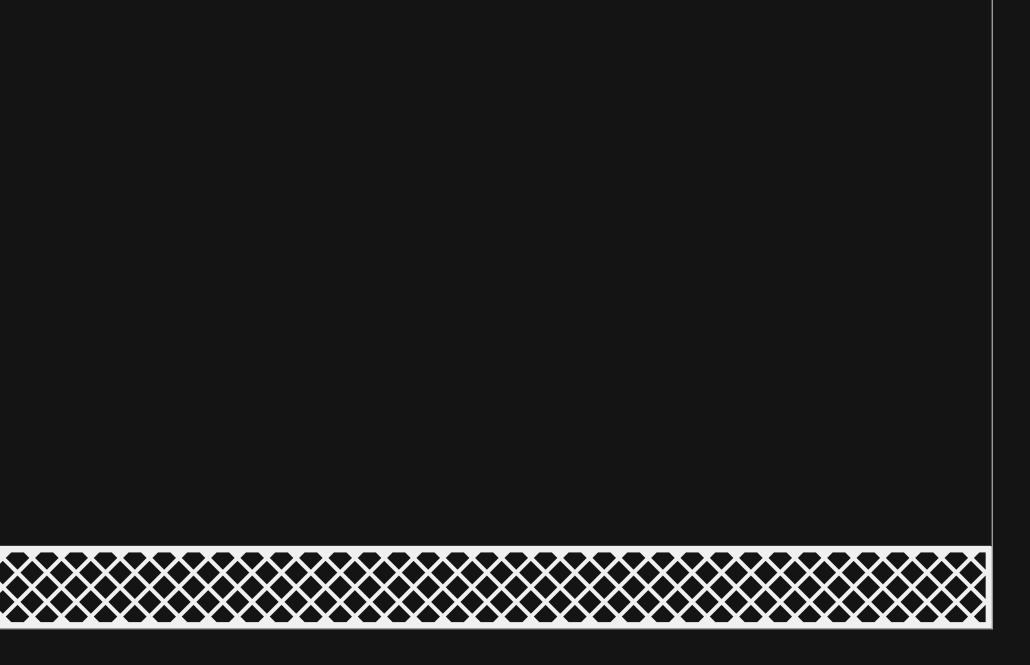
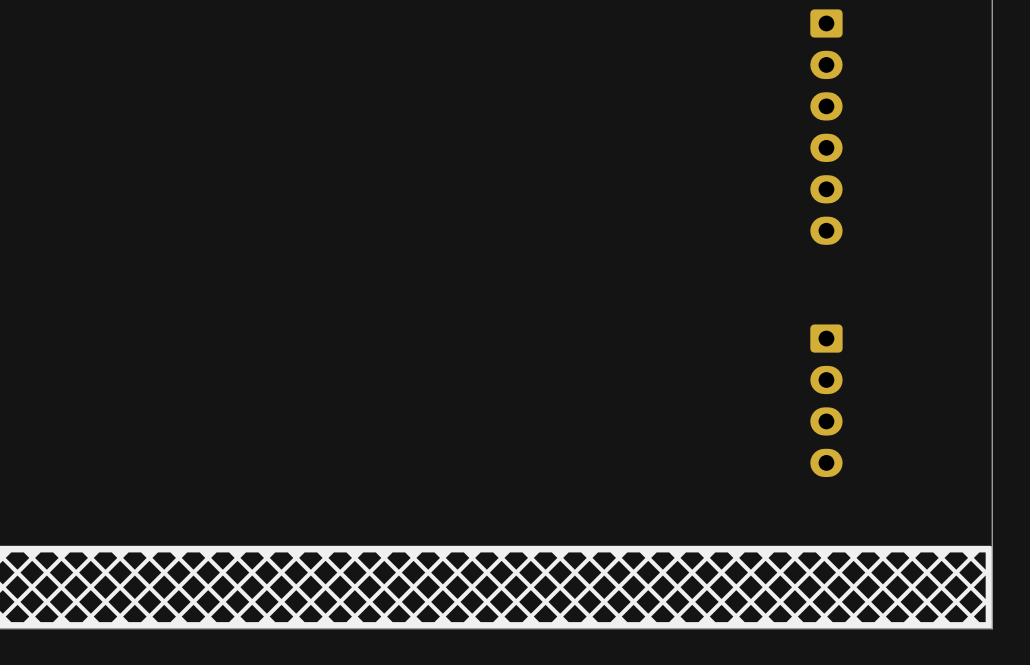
part: none -> (826, 127)
part: none -> (826, 400)

